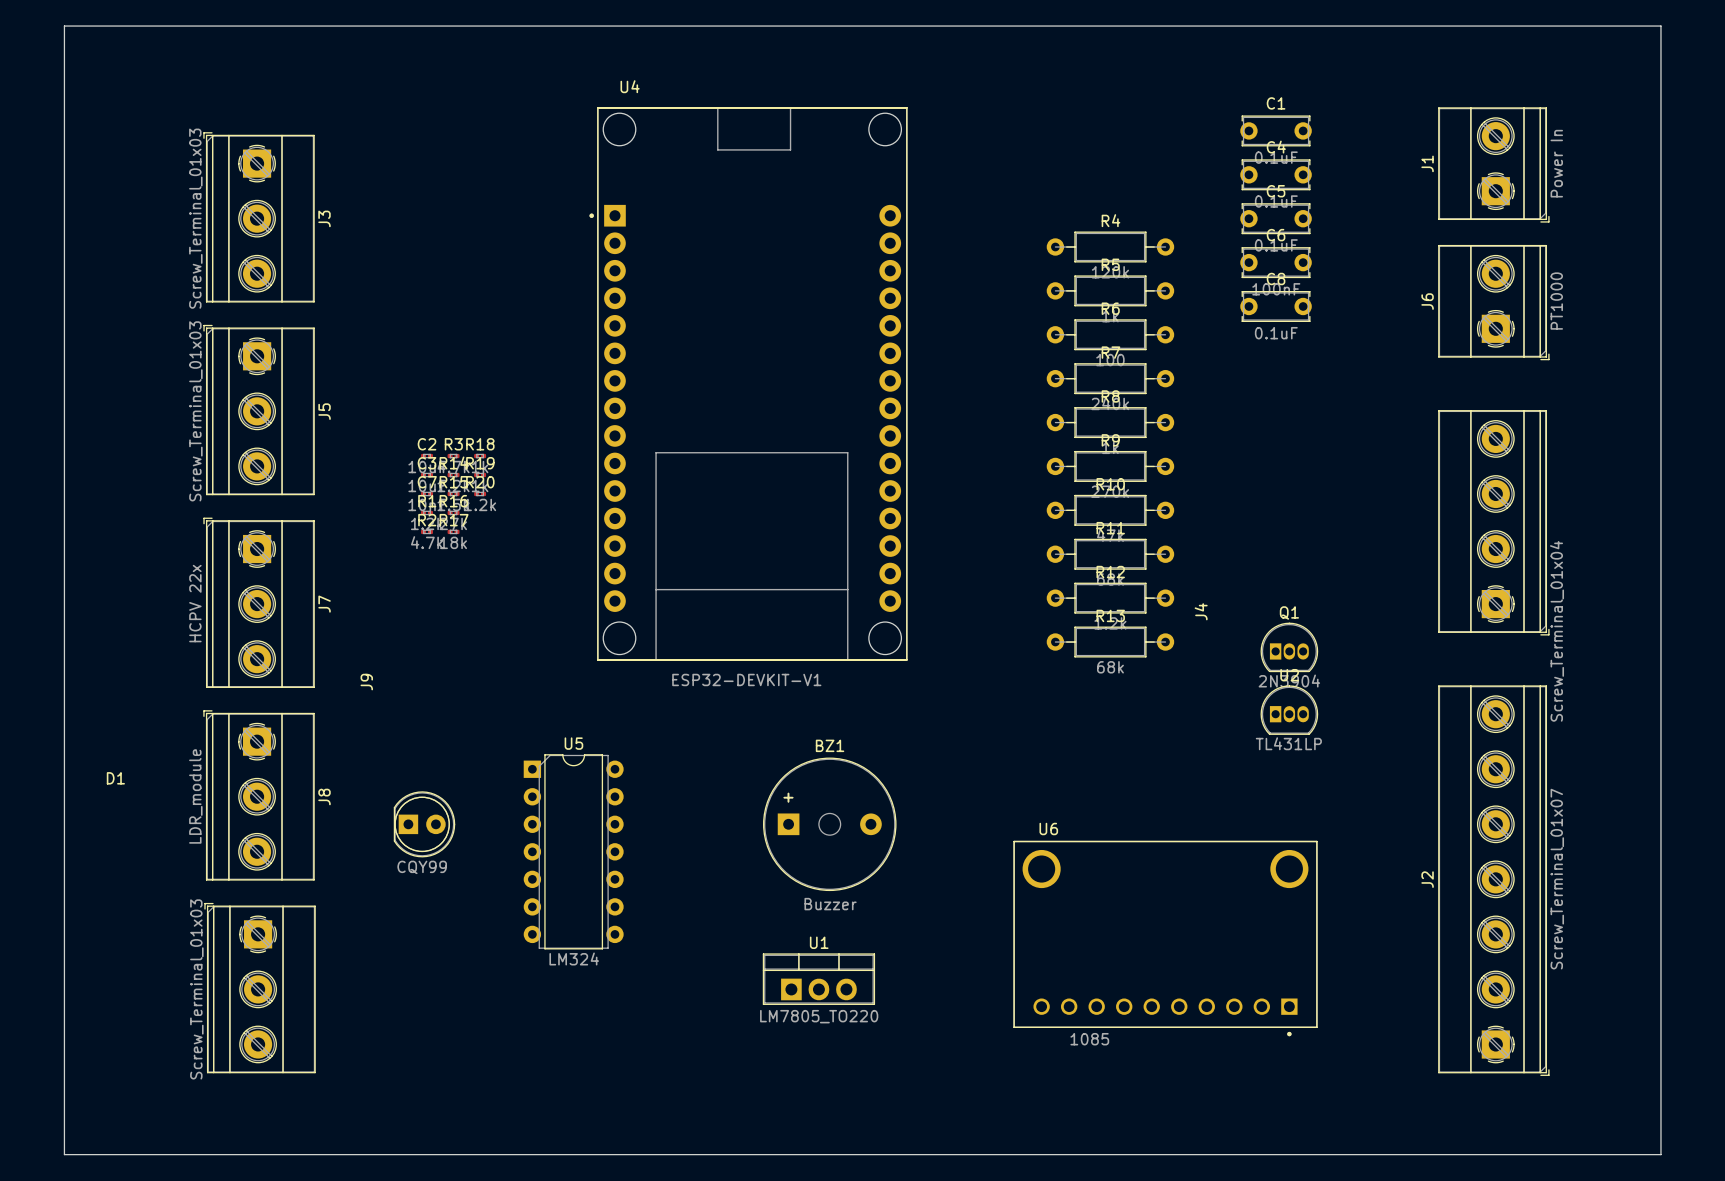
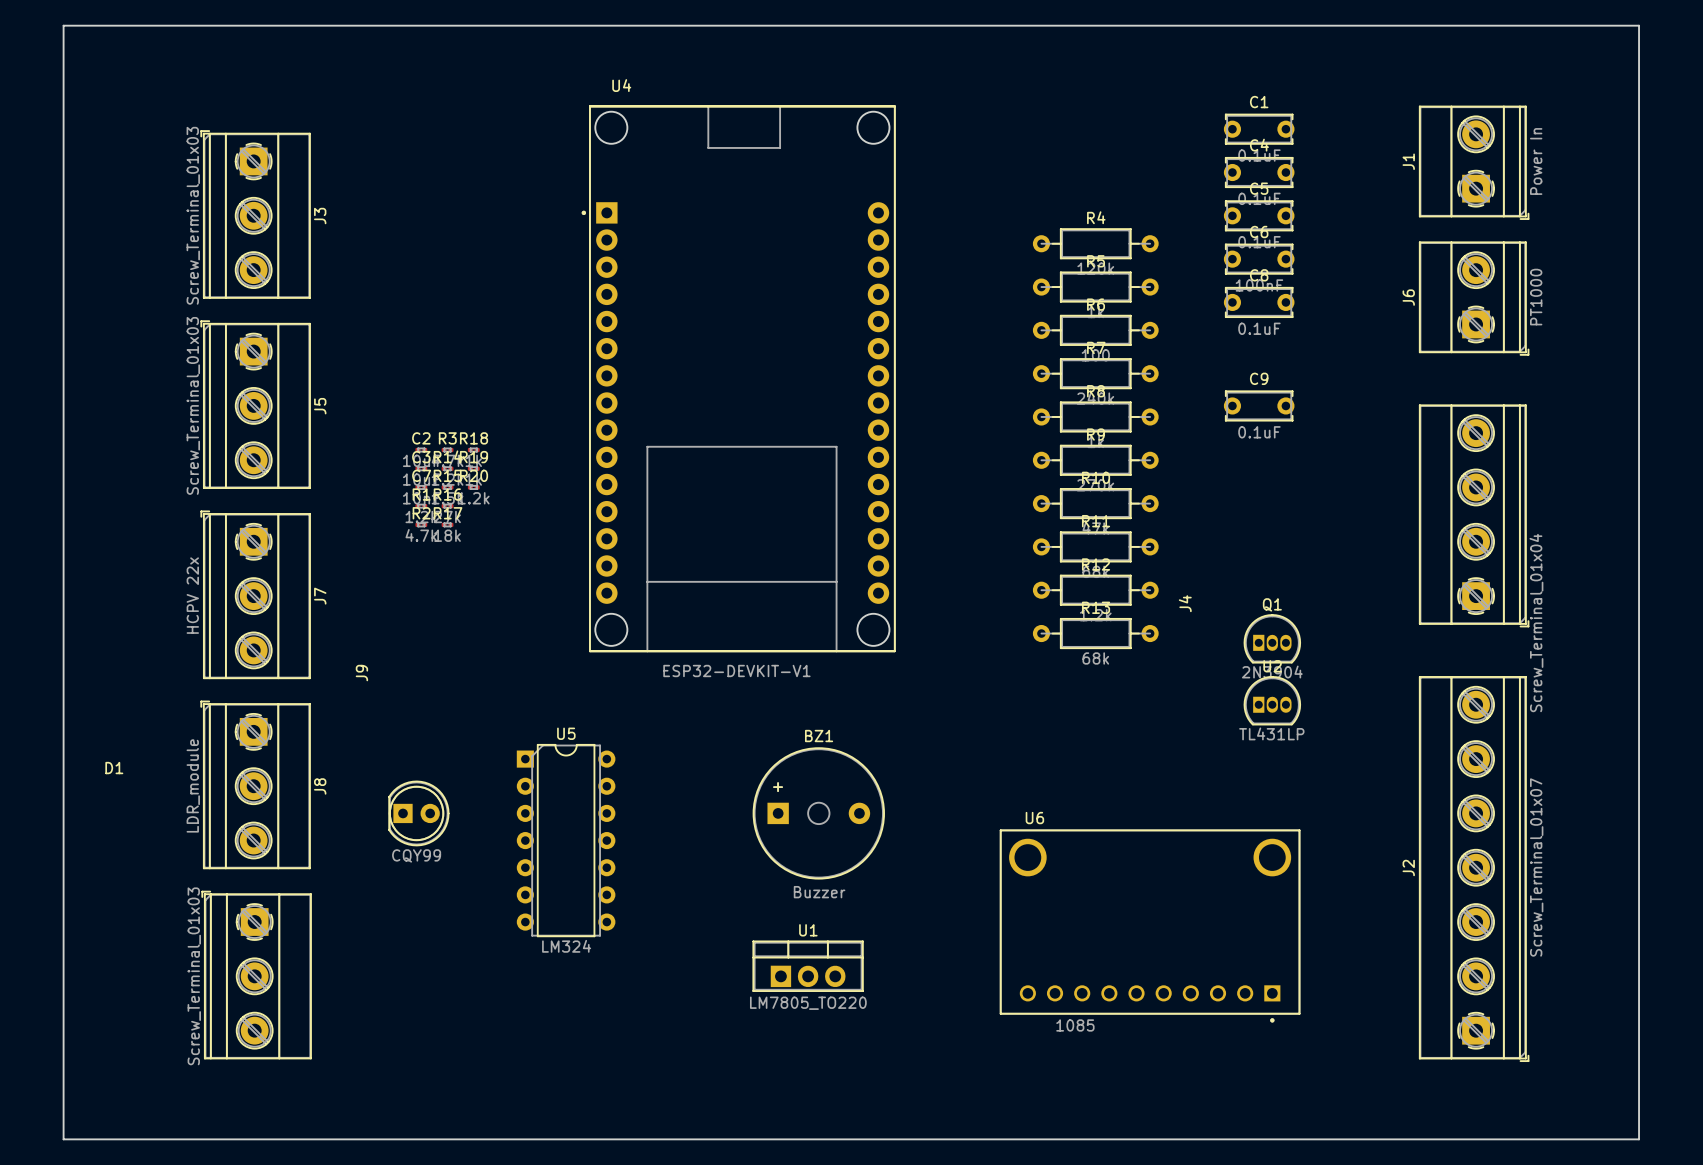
C9: none -> 0.1uF (1259, 405)

